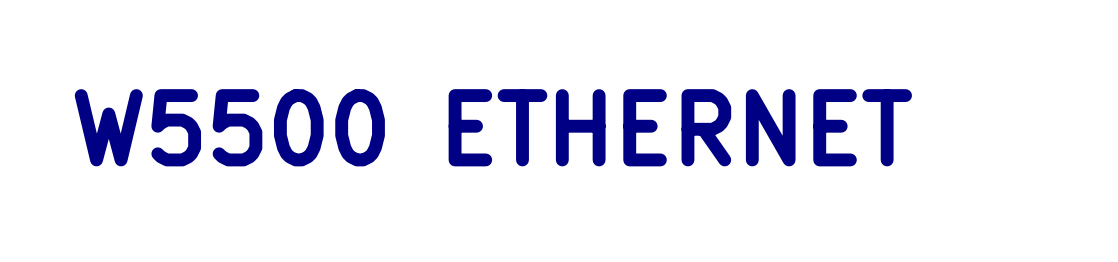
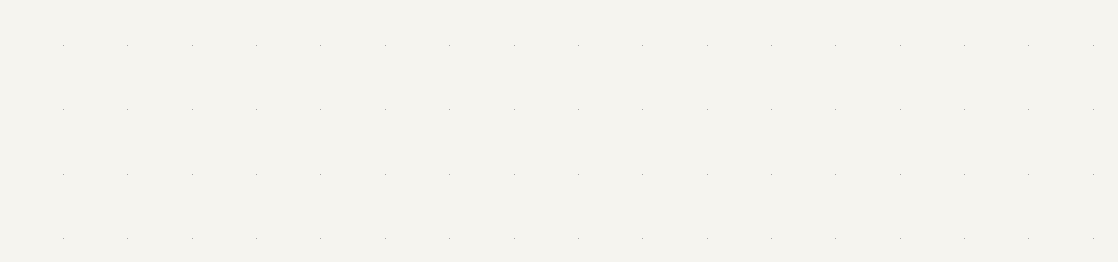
text: W5500 ETHERNET (493, 127) -> none

